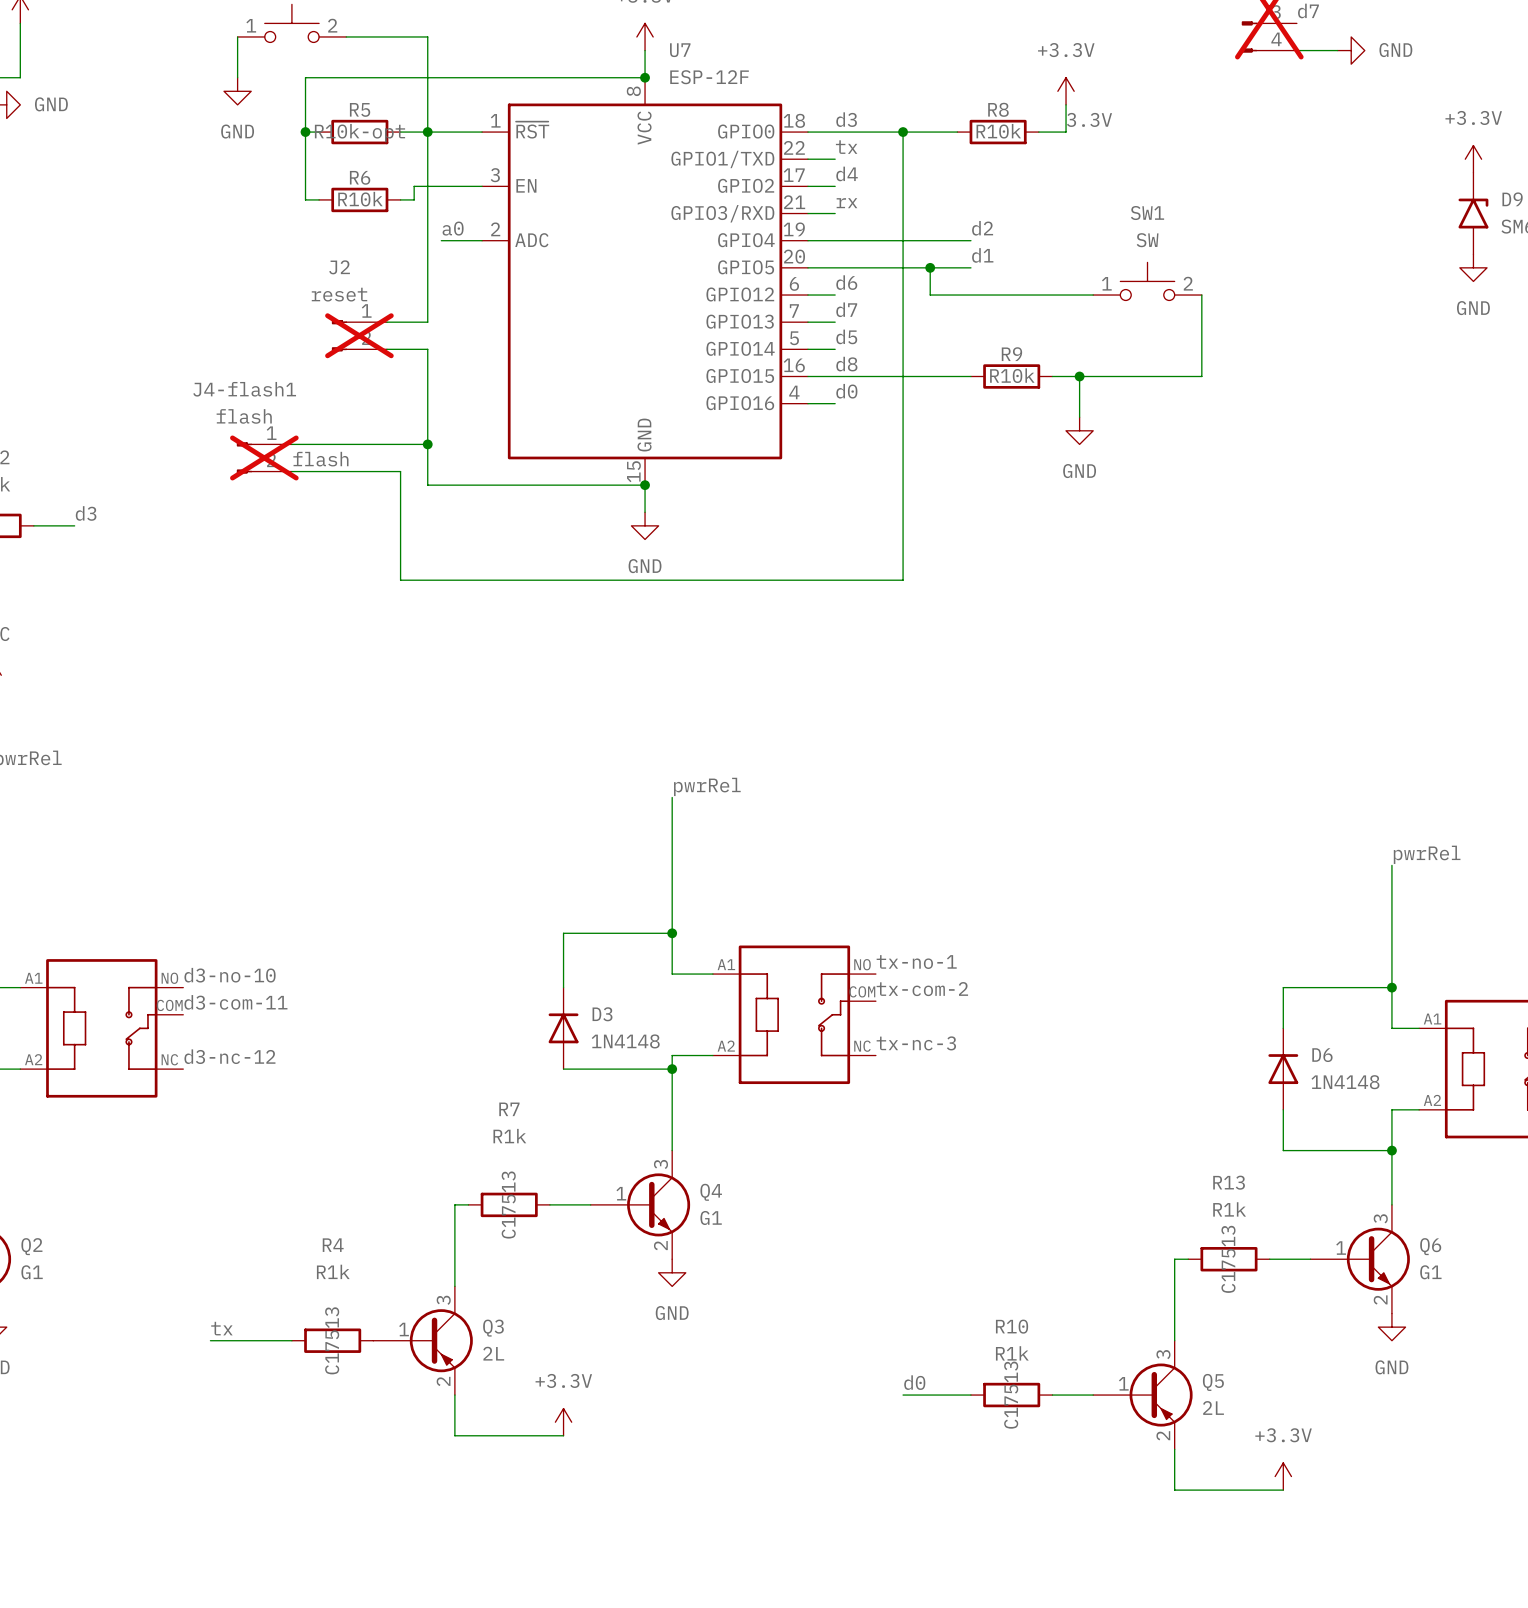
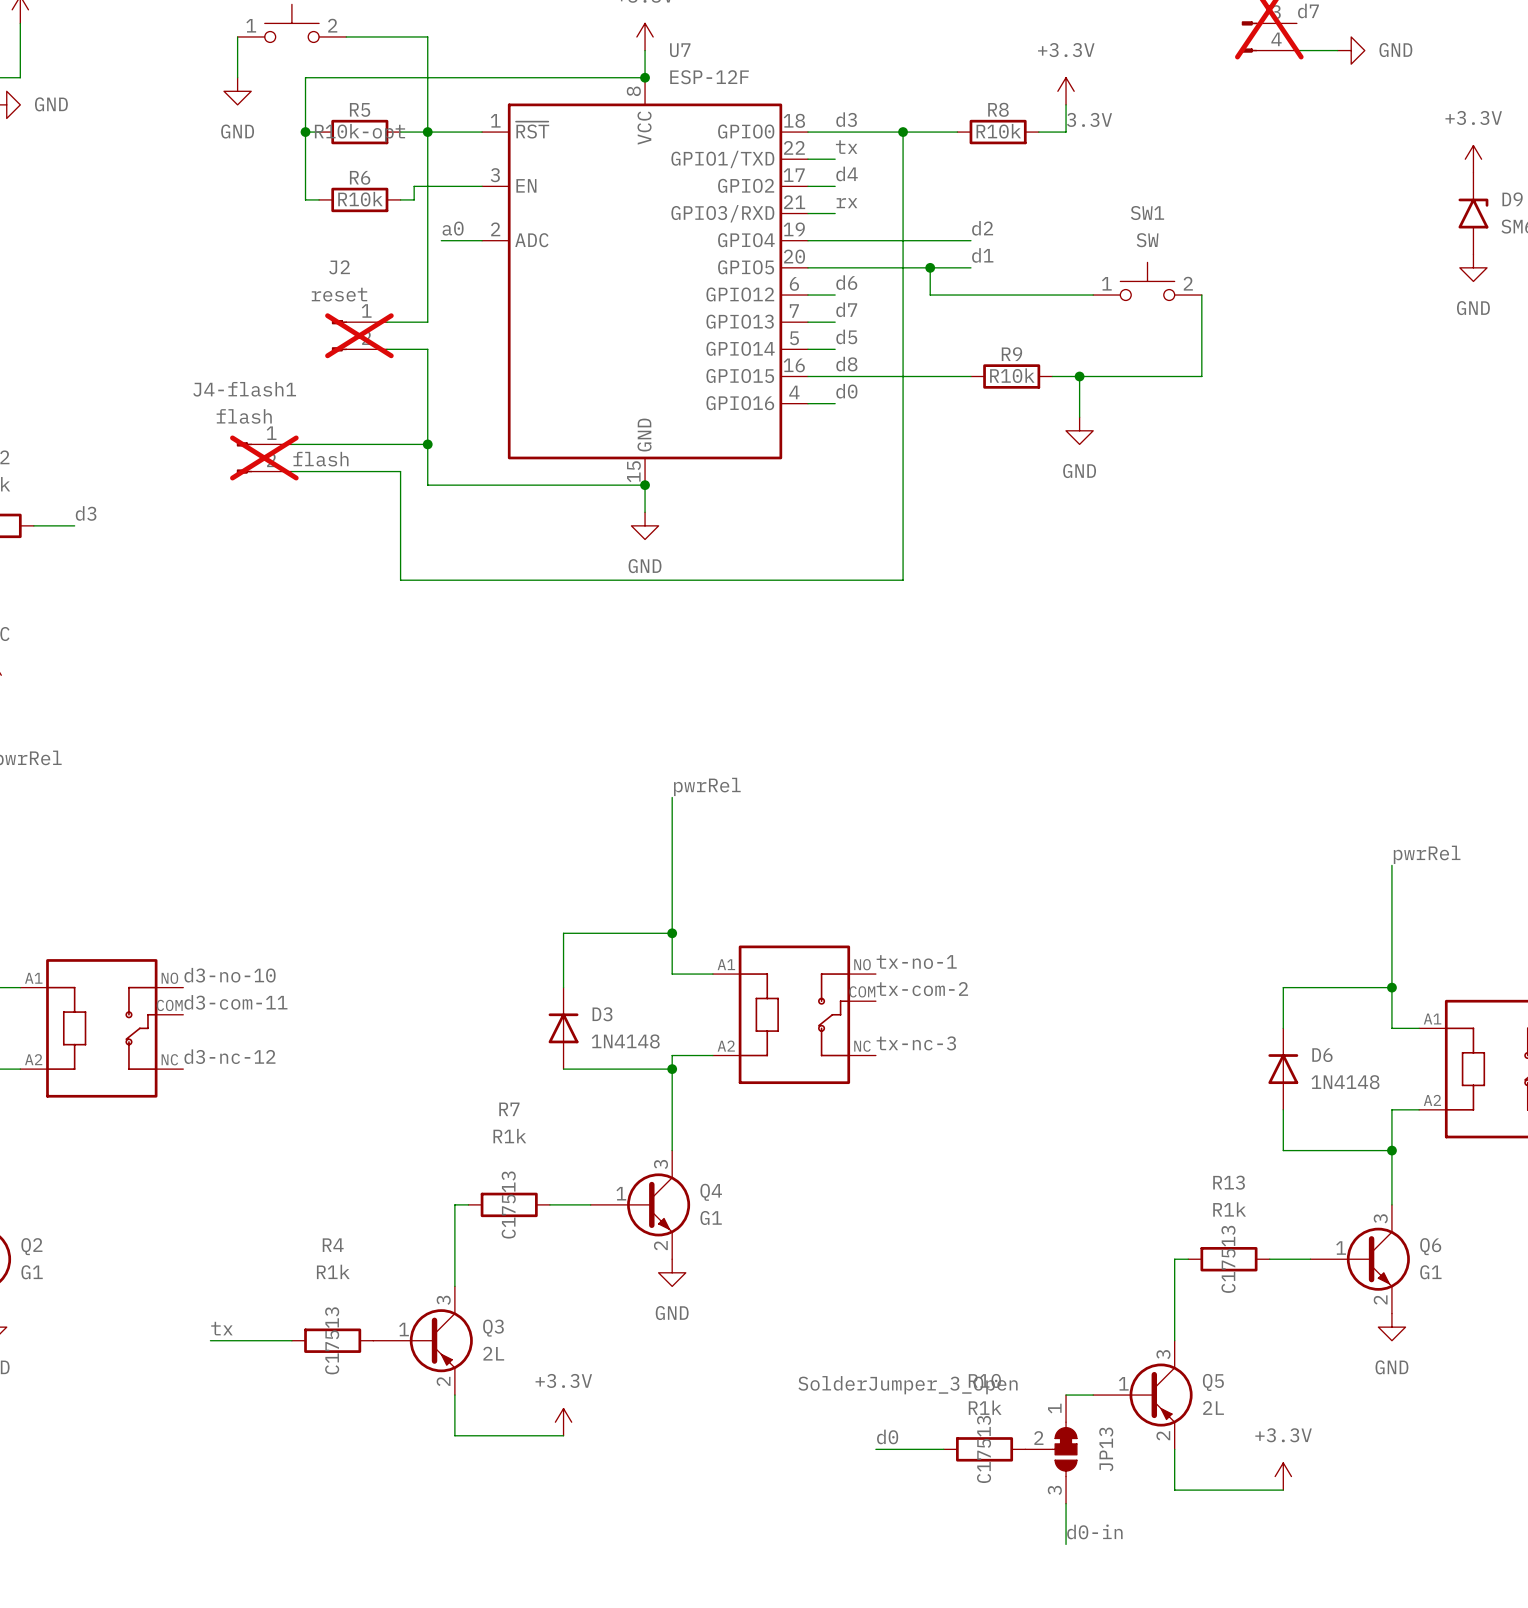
label position: d0 (914, 1382) -> d0 (887, 1436)
wire: (903, 1395) (970, 1395) -> (875, 1449) (943, 1449)
R10 position: (1011, 1395) -> (984, 1449)
wire: (1052, 1395) (1066, 1395) -> none
JP13: none -> SolderJumper_3_Open (1051, 1449)
wire: none -> (1066, 1503) (1066, 1544)
label: none -> d0-in (1094, 1531)

